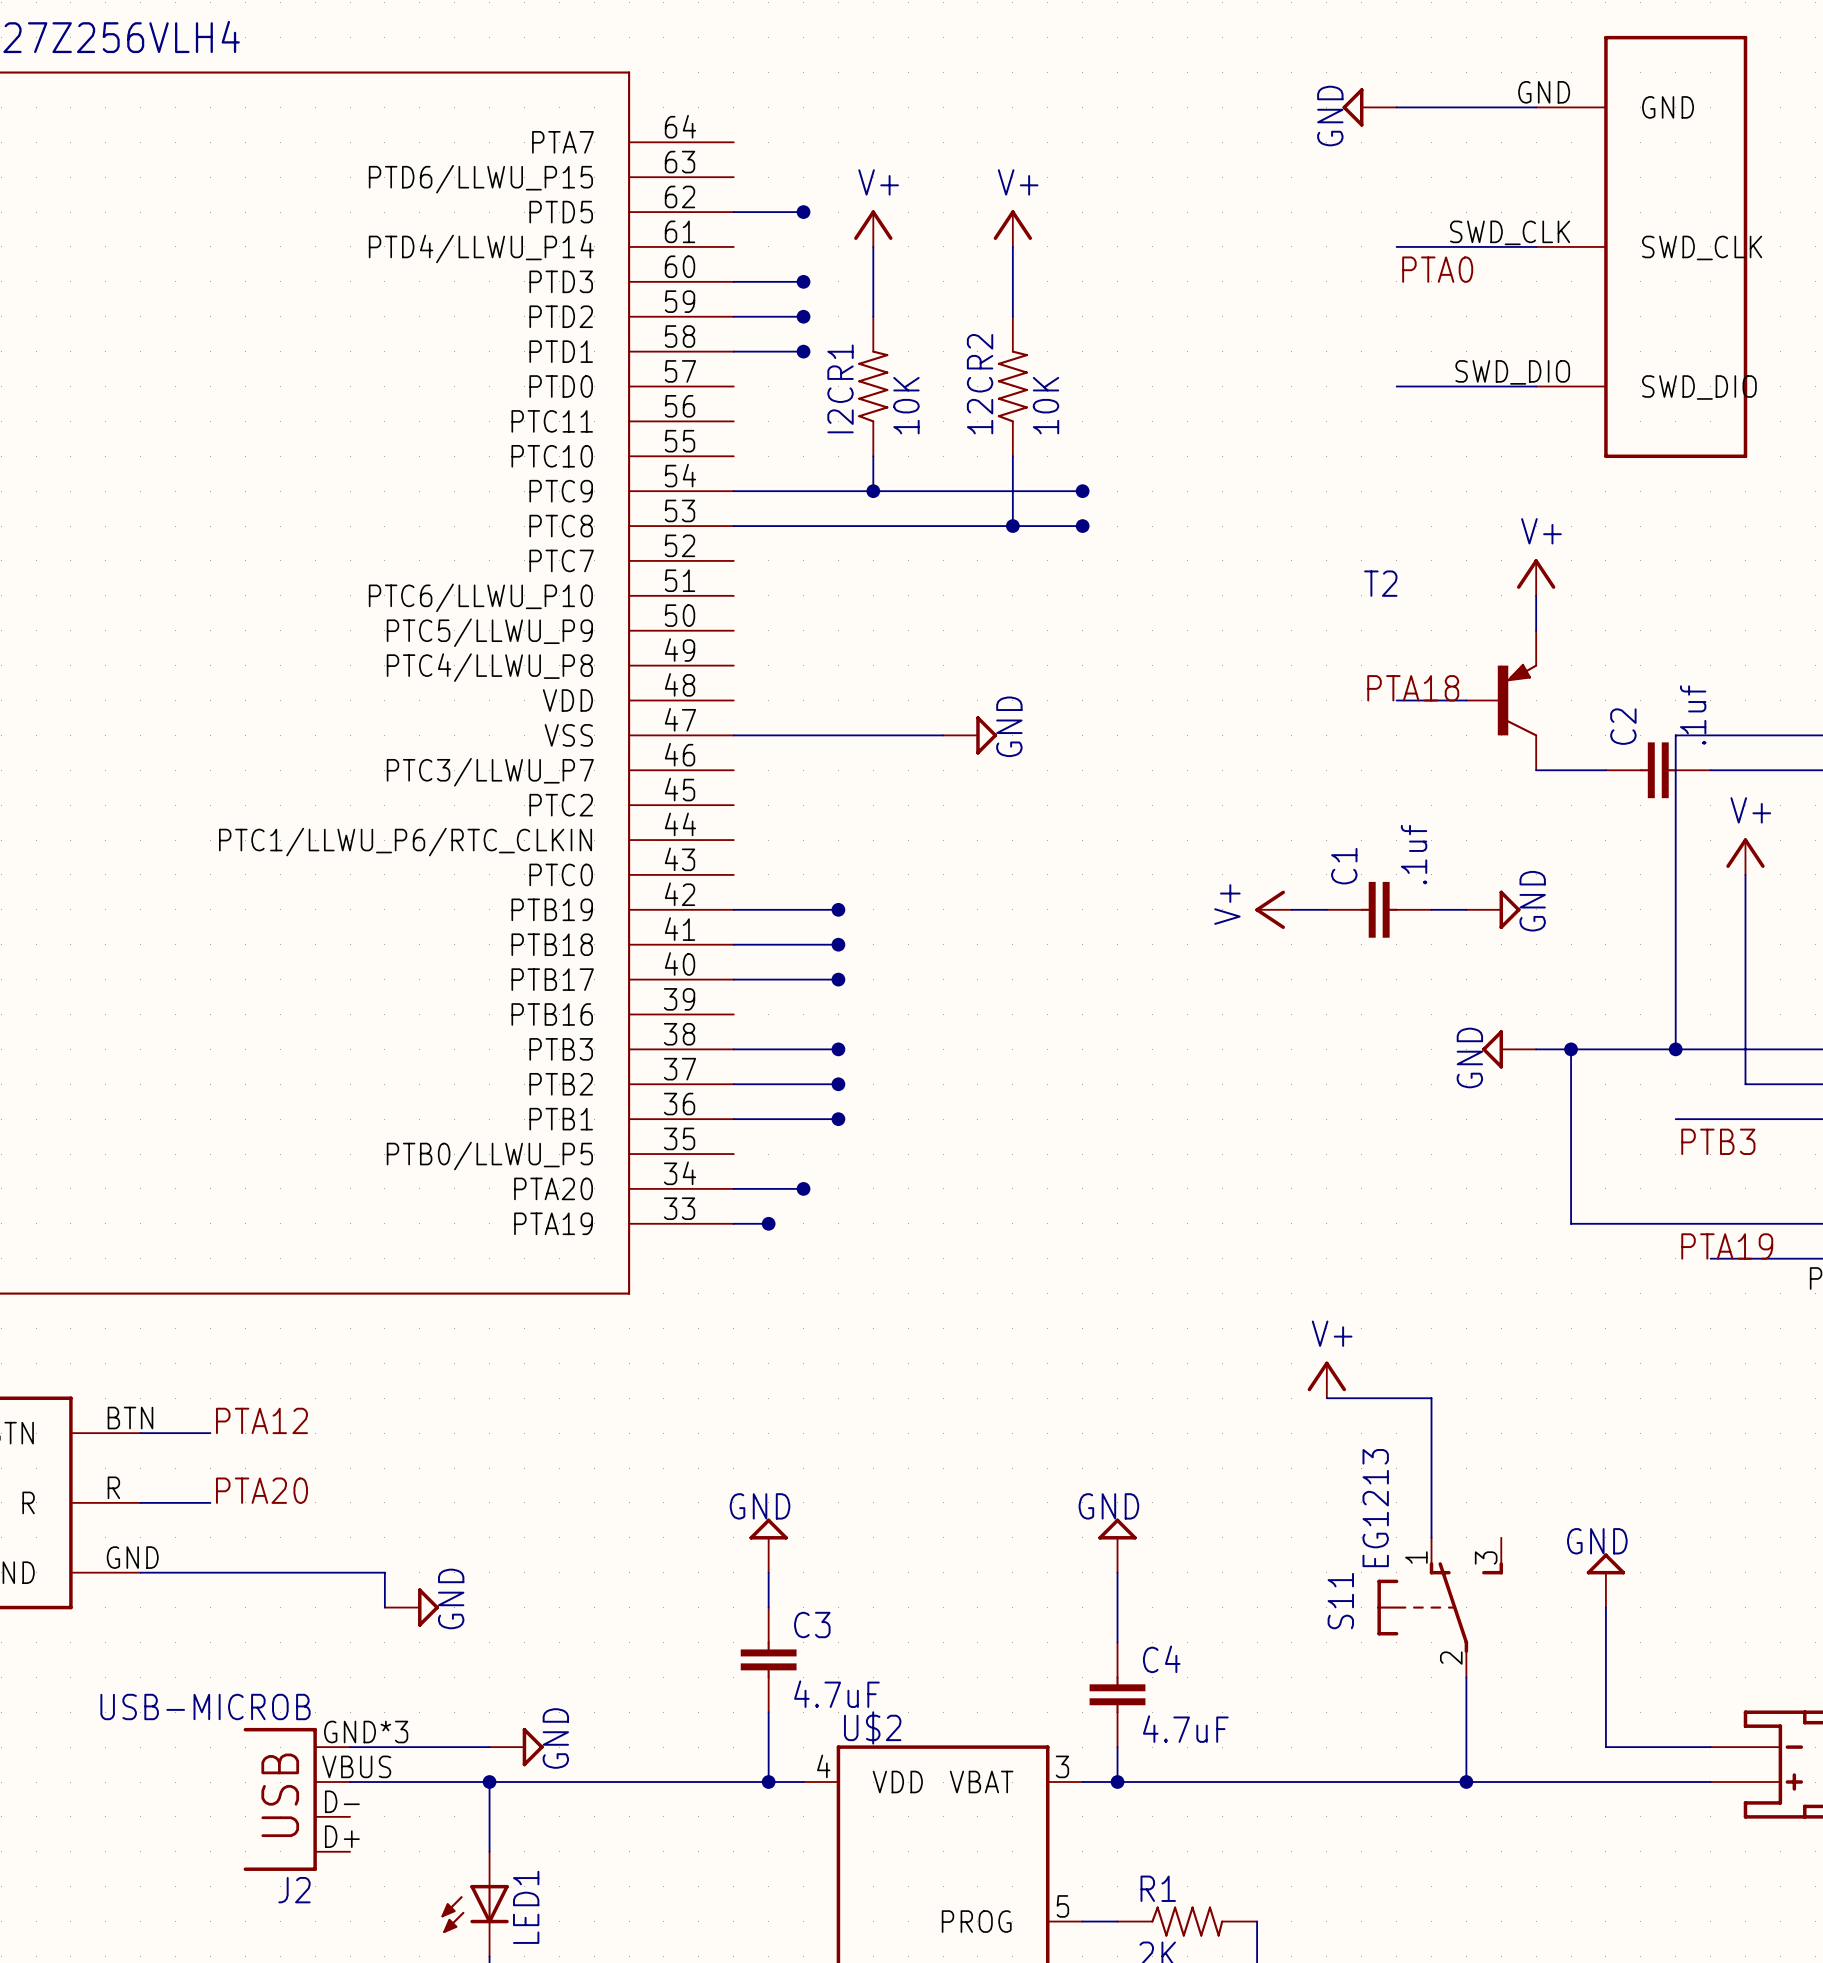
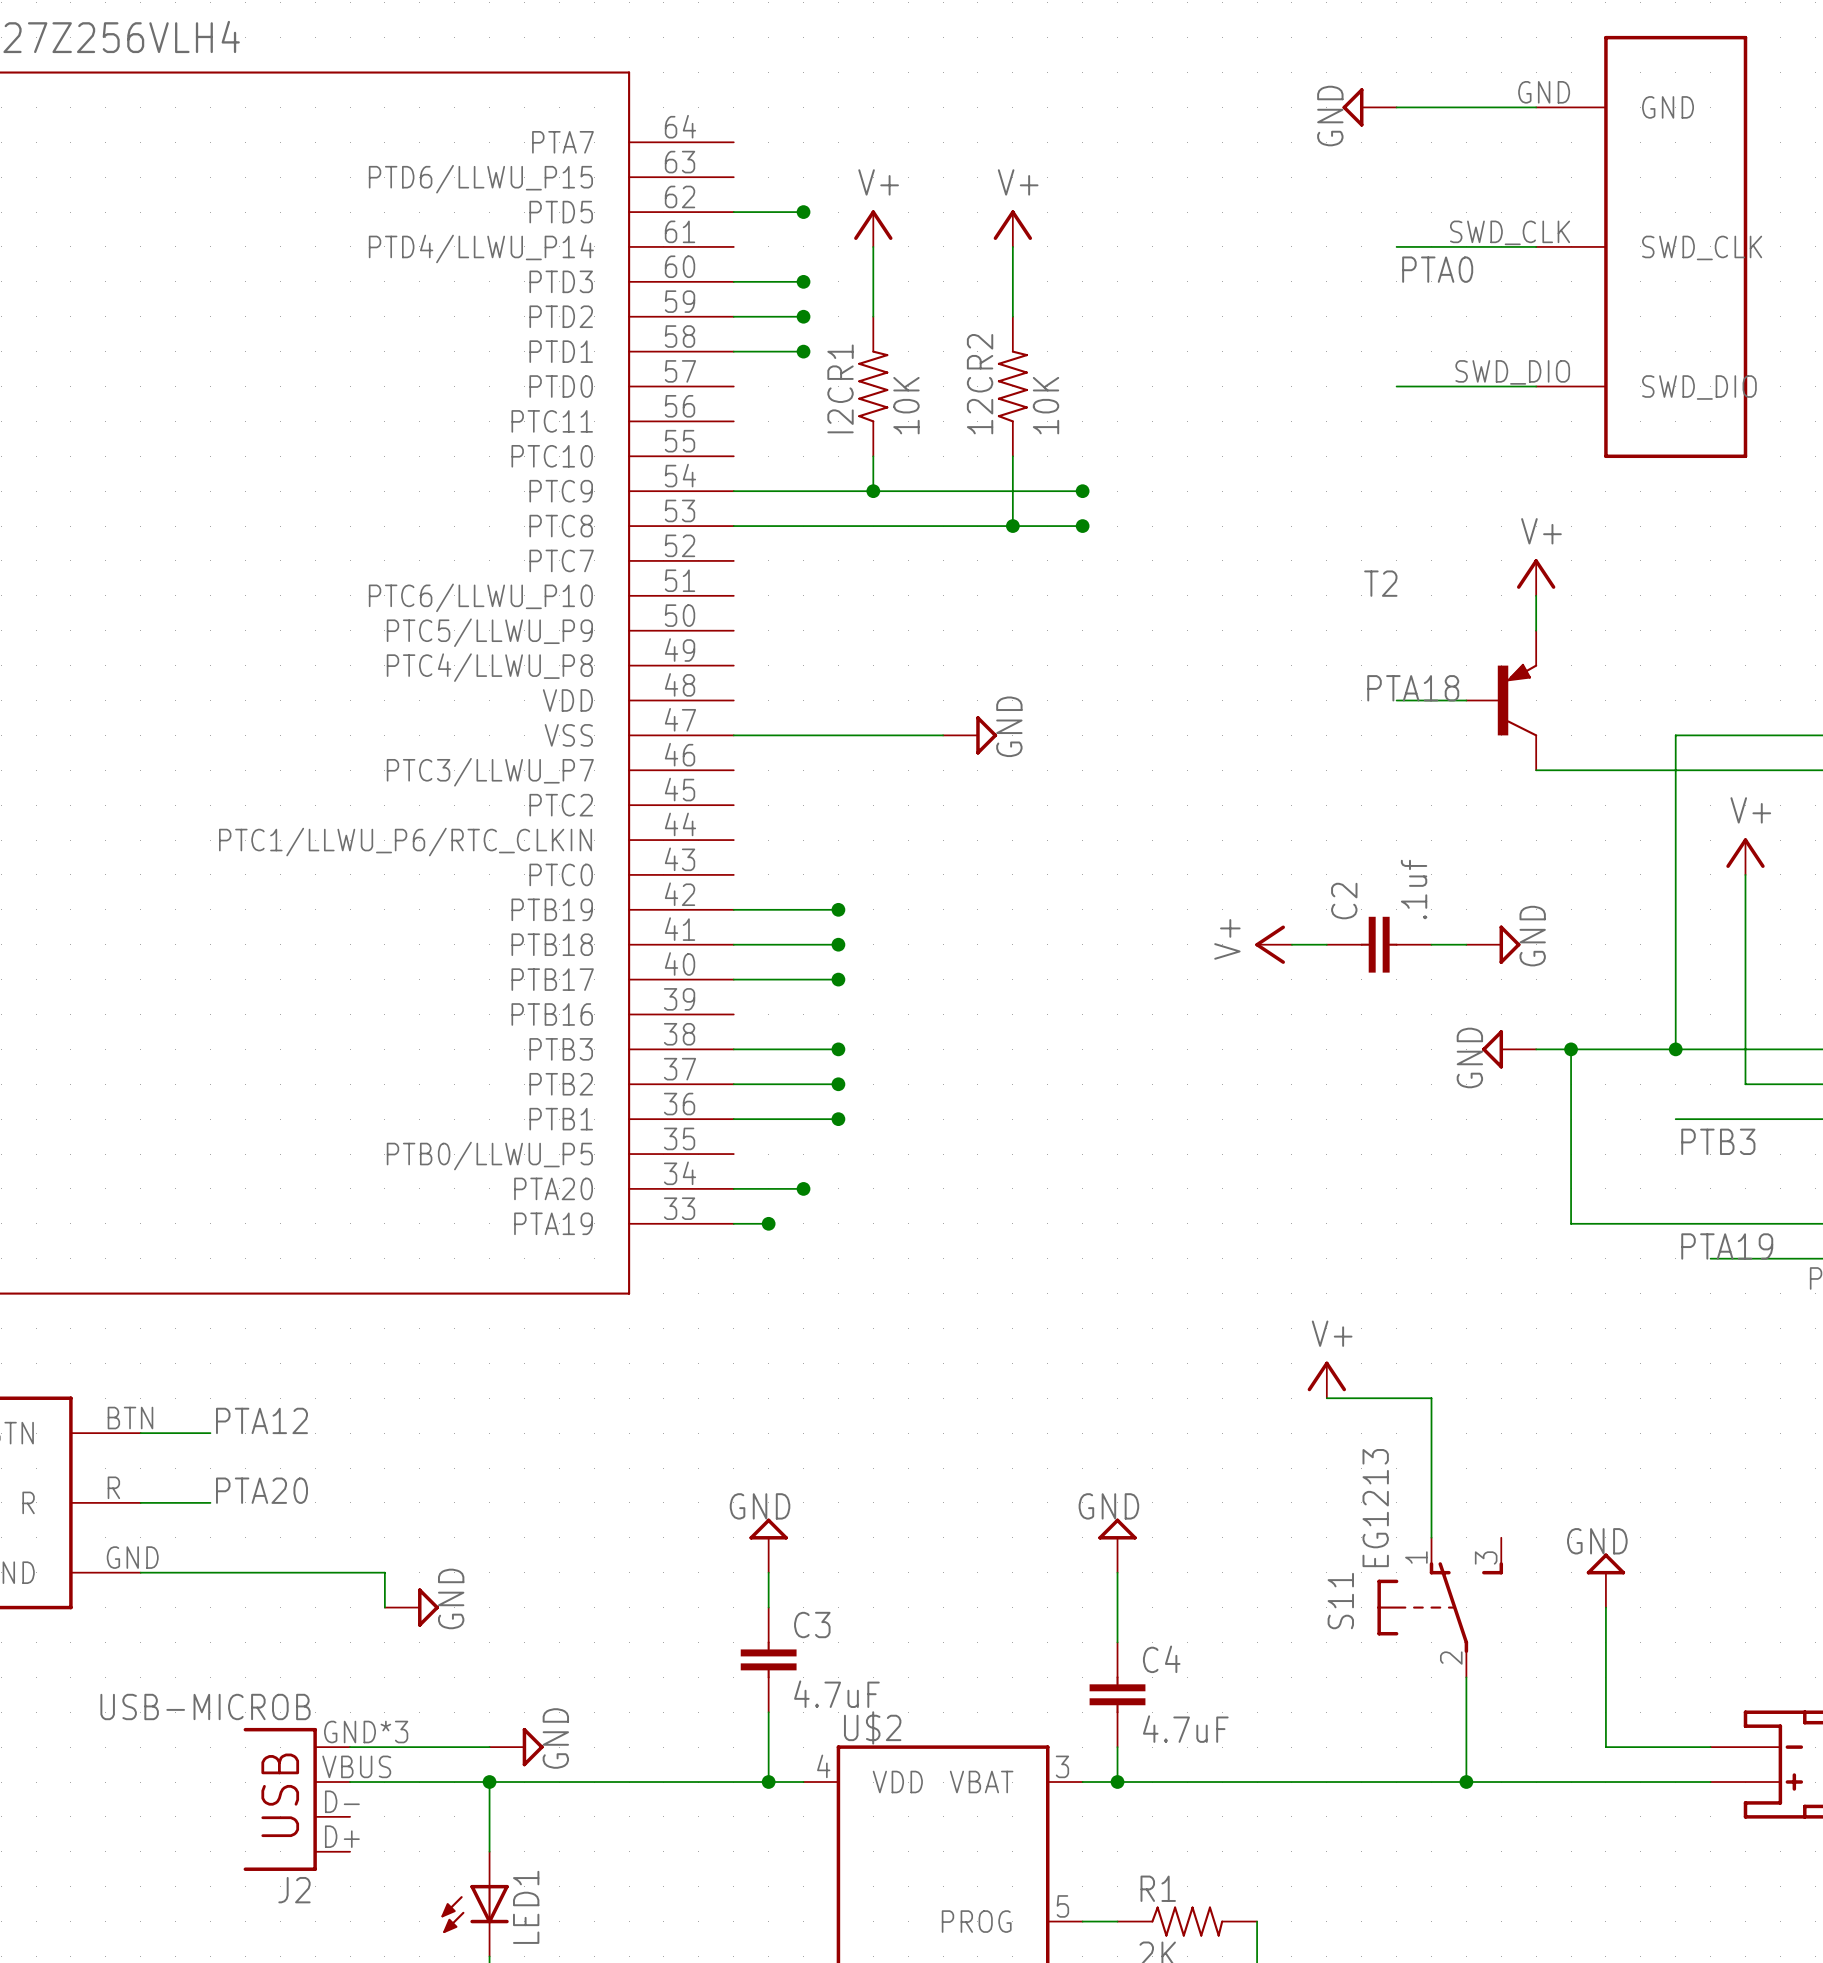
C2 position: (1658, 770) -> (1379, 944)
power symbol position: V+ (1273, 909) -> V+ (1273, 944)
wire: (1291, 909) (1326, 909) -> (1291, 944) (1326, 944)
C1: .1uf (1379, 909) -> none
wire: (1431, 909) (1466, 909) -> (1431, 944) (1466, 944)
power symbol position: GND (1493, 909) -> GND (1493, 944)

